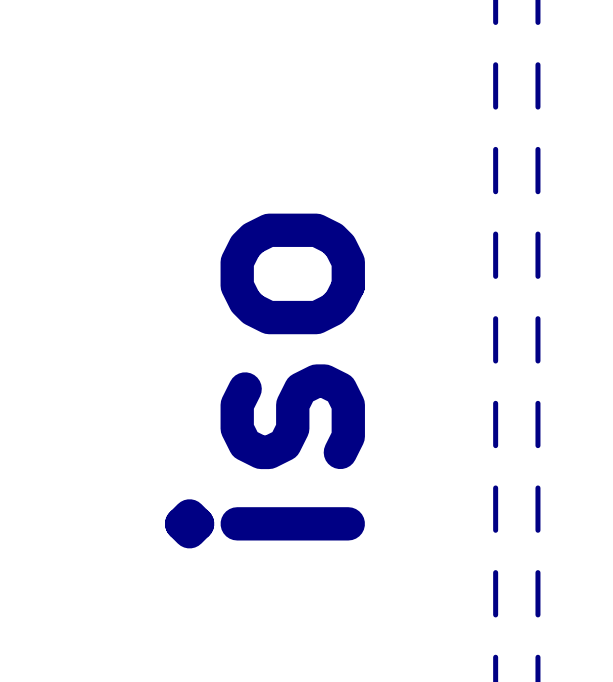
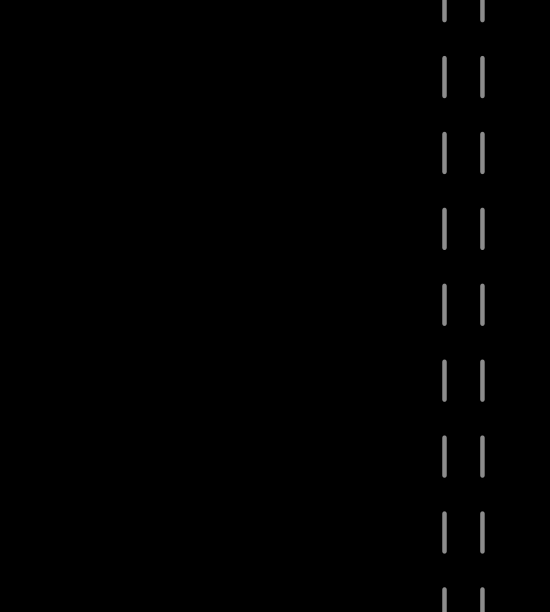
text: iso (264, 381) -> none

